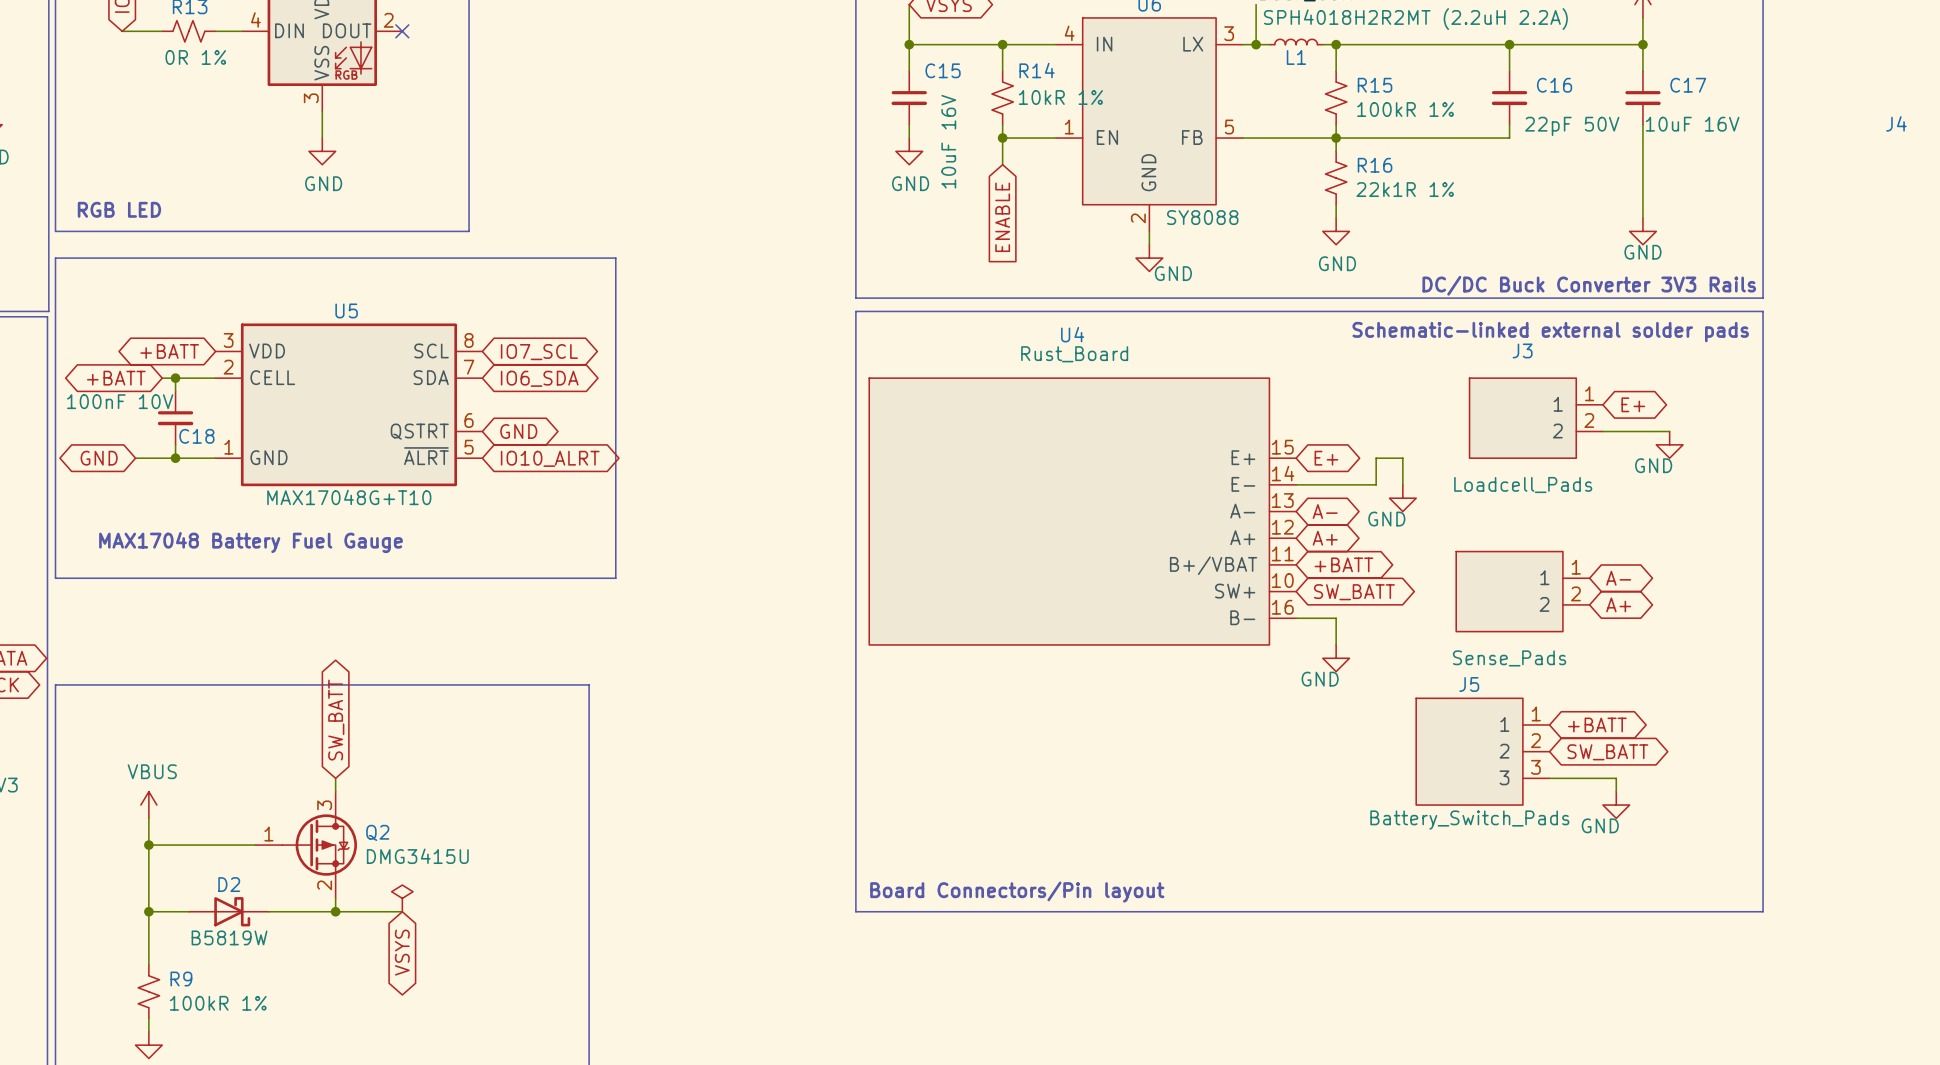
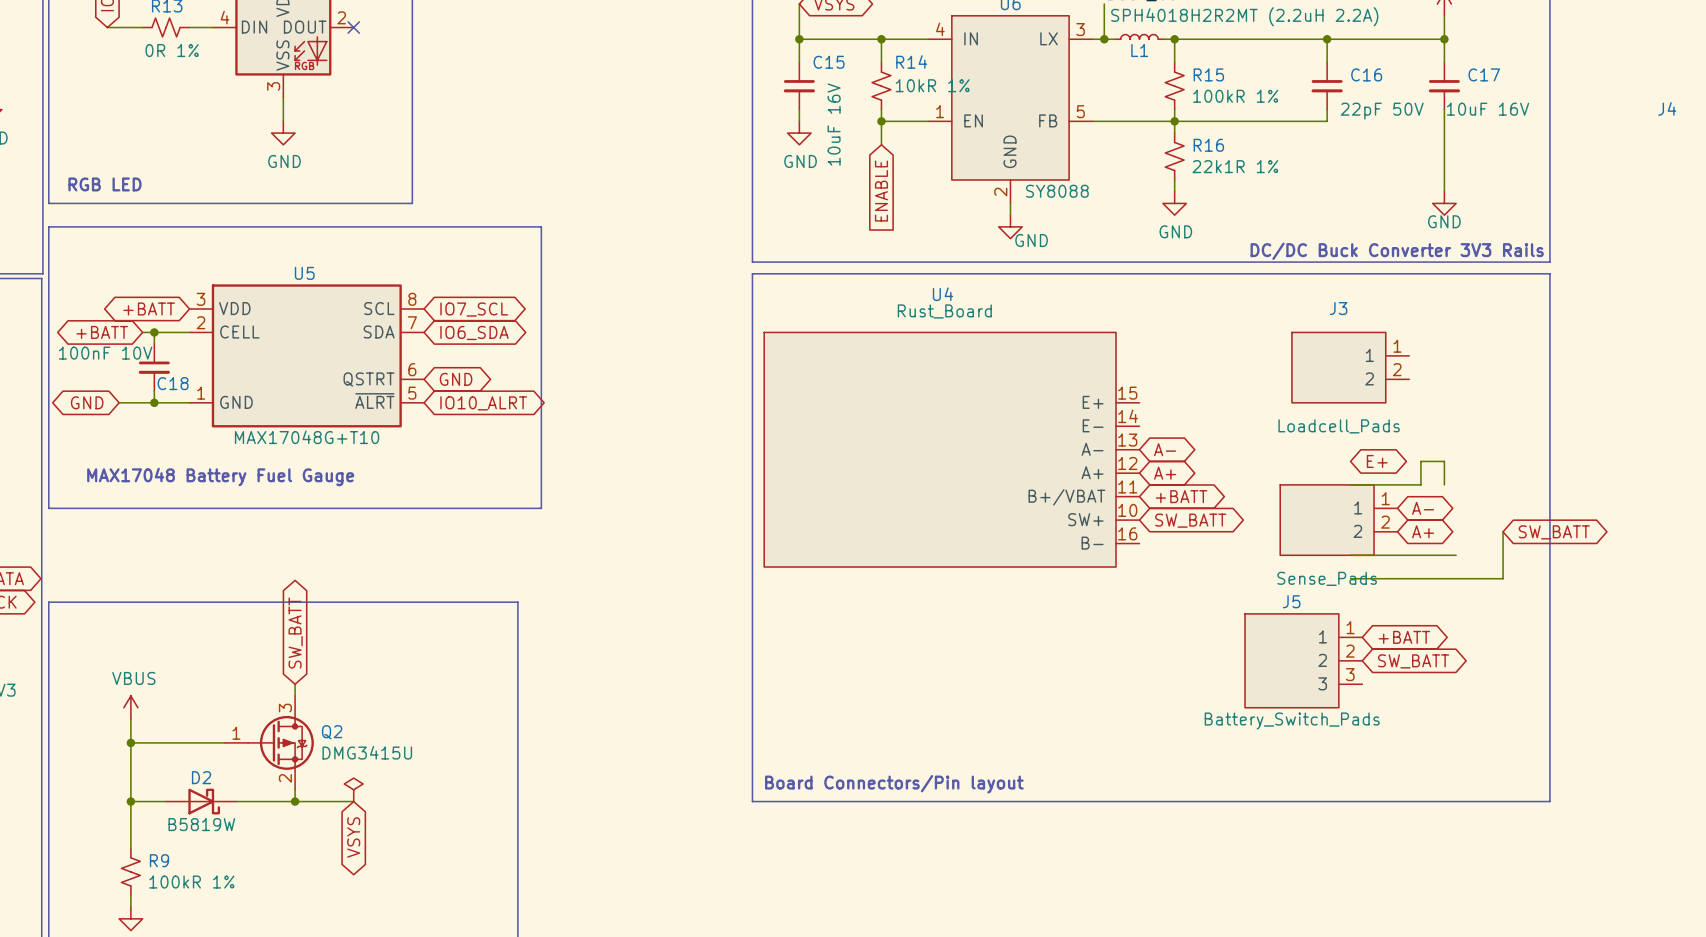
text: Schematic-linked external solder pads (1550, 332) -> none
global label: E+ (1633, 404) -> none
wire: (1602, 431) (1669, 431) -> none
power symbol: GND (1669, 444) -> none
global label: E+ (1326, 458) -> none
wire: (1296, 484) (1376, 484) (1376, 458) (1402, 458) (1402, 484) -> (1350, 484) (1420, 484) (1420, 461) (1444, 461) (1444, 484)
power symbol: GND (1402, 498) -> none
global label: none -> E+ (1377, 461)
wire: none -> (1503, 531) (1503, 578) (1350, 578)
global label: none -> SW_BATT (1554, 532)
wire: (1296, 618) (1336, 618) (1336, 644) -> none
wire: none -> (1350, 555) (1456, 555)
power symbol: GND (1336, 658) -> none
wire: (1549, 778) (1616, 778) (1616, 791) -> none
power symbol: GND (1616, 805) -> none

